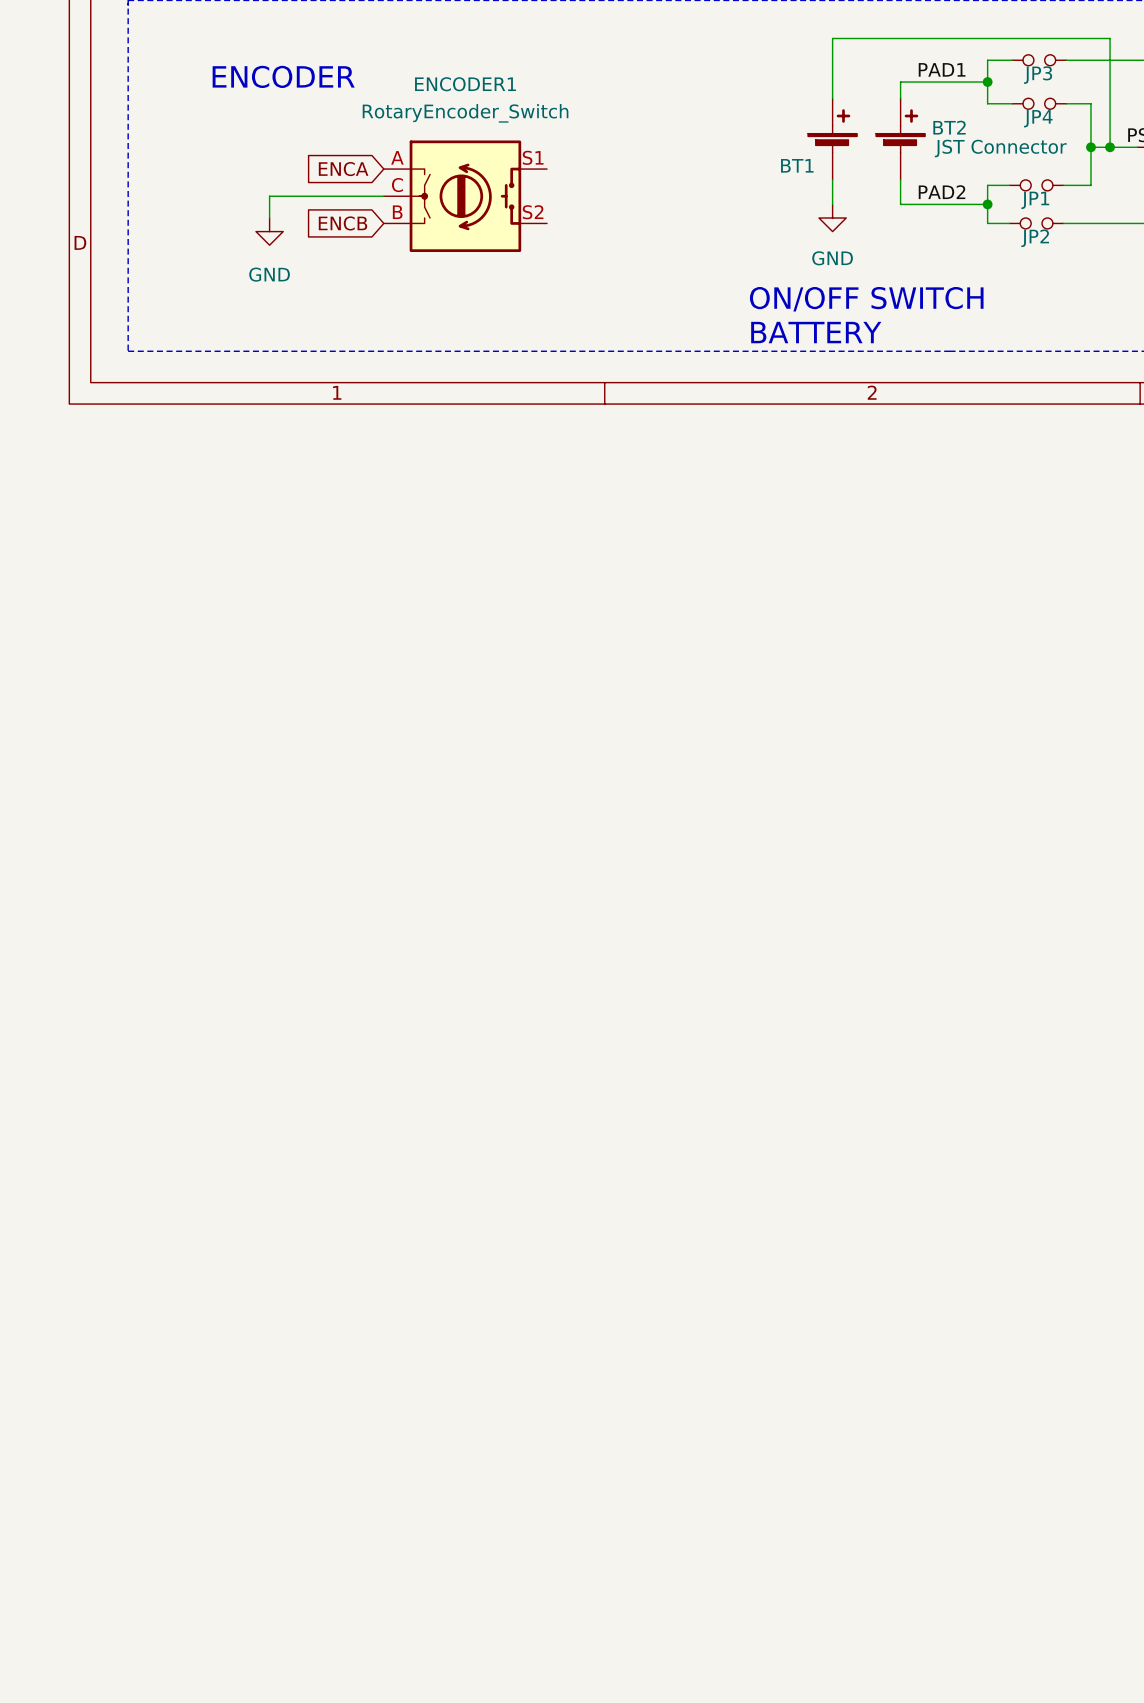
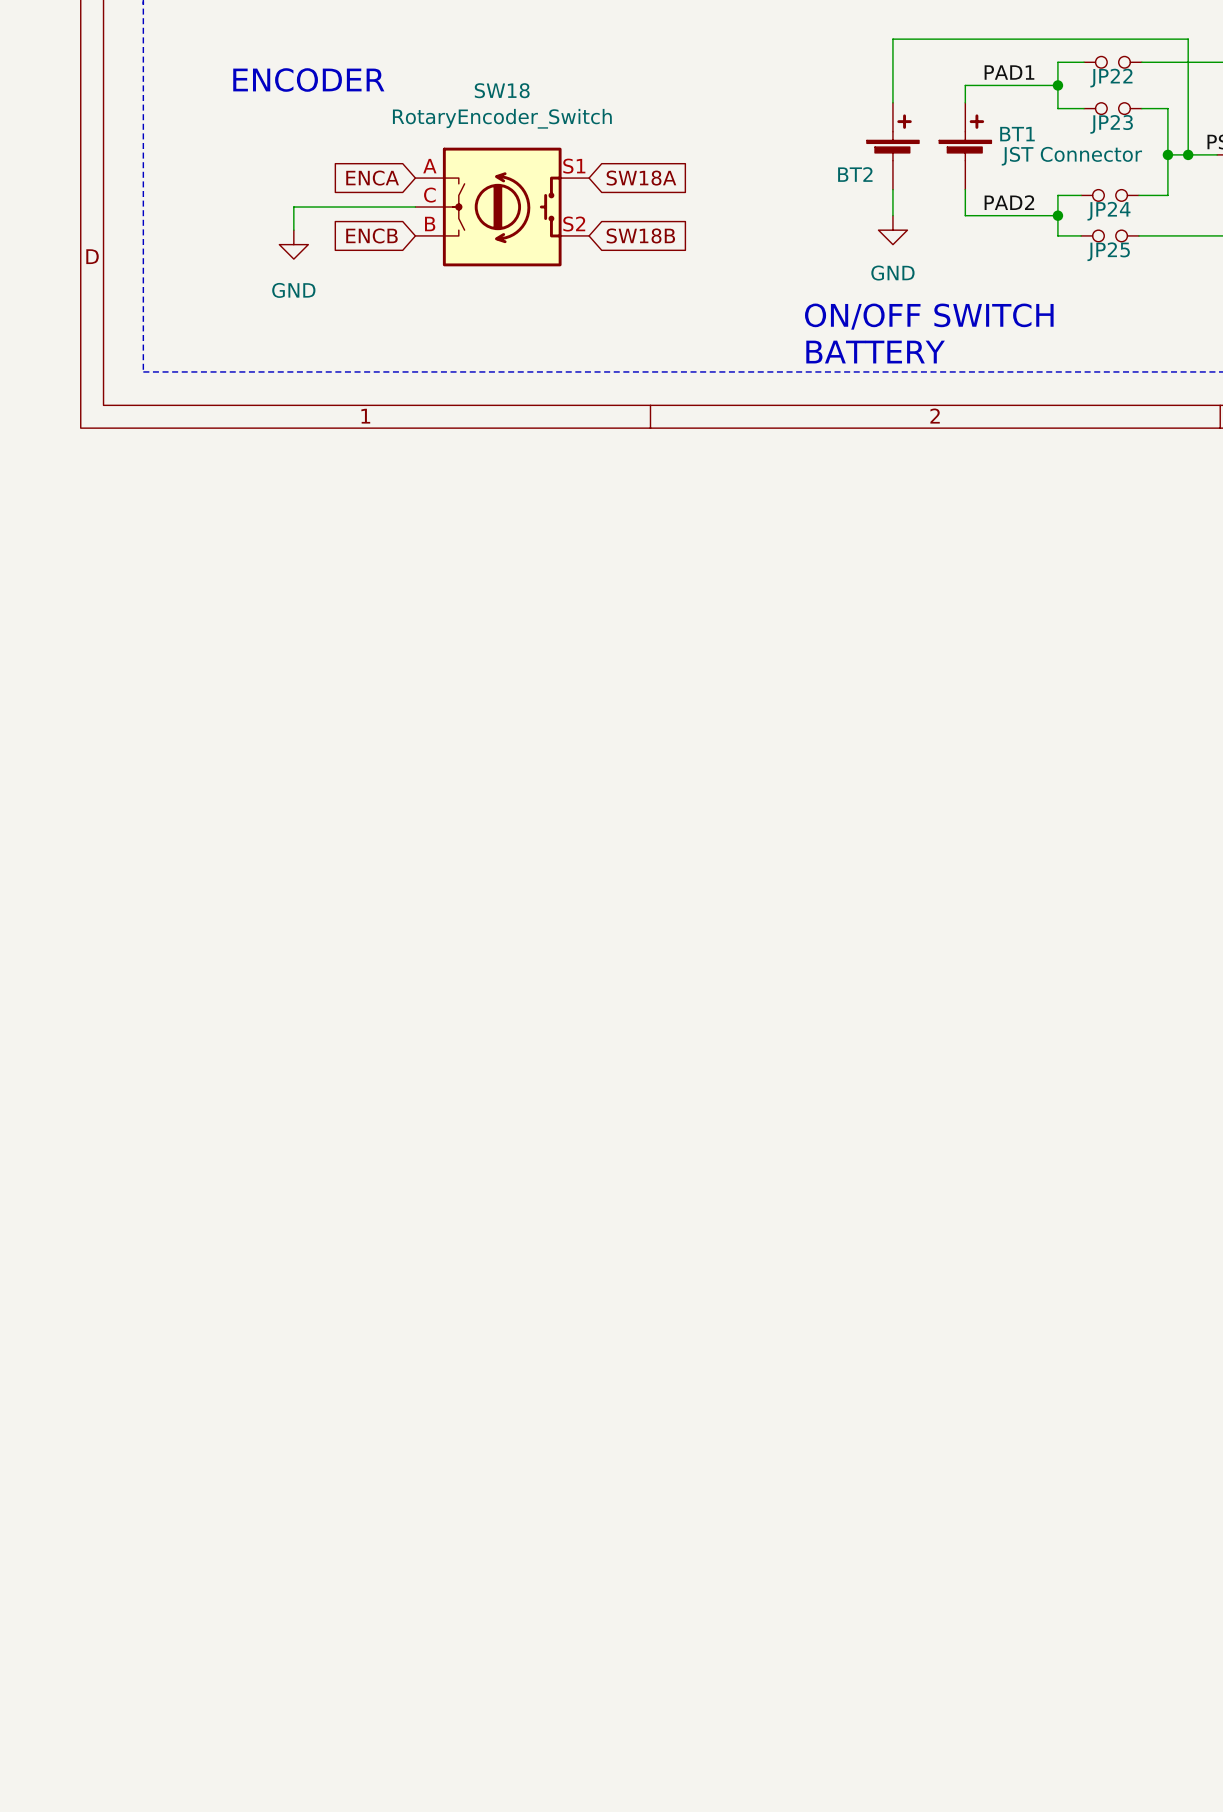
JP3 name: JP3 (1038, 75) -> JP22 (1111, 78)
ENCODER1 name: ENCODER1 (465, 84) -> SW18 (502, 90)
JP4 name: JP4 (1038, 118) -> JP23 (1111, 124)
BT2 name: BT2 (949, 127) -> BT1 (1017, 134)
BT1 name: BT1 (797, 165) -> BT2 (855, 174)
global label: none -> SW18A (641, 178)
JP1 name: JP1 (1035, 200) -> JP24 (1108, 211)
global label: none -> SW18B (640, 235)
JP2 name: JP2 (1035, 238) -> JP25 (1108, 251)

